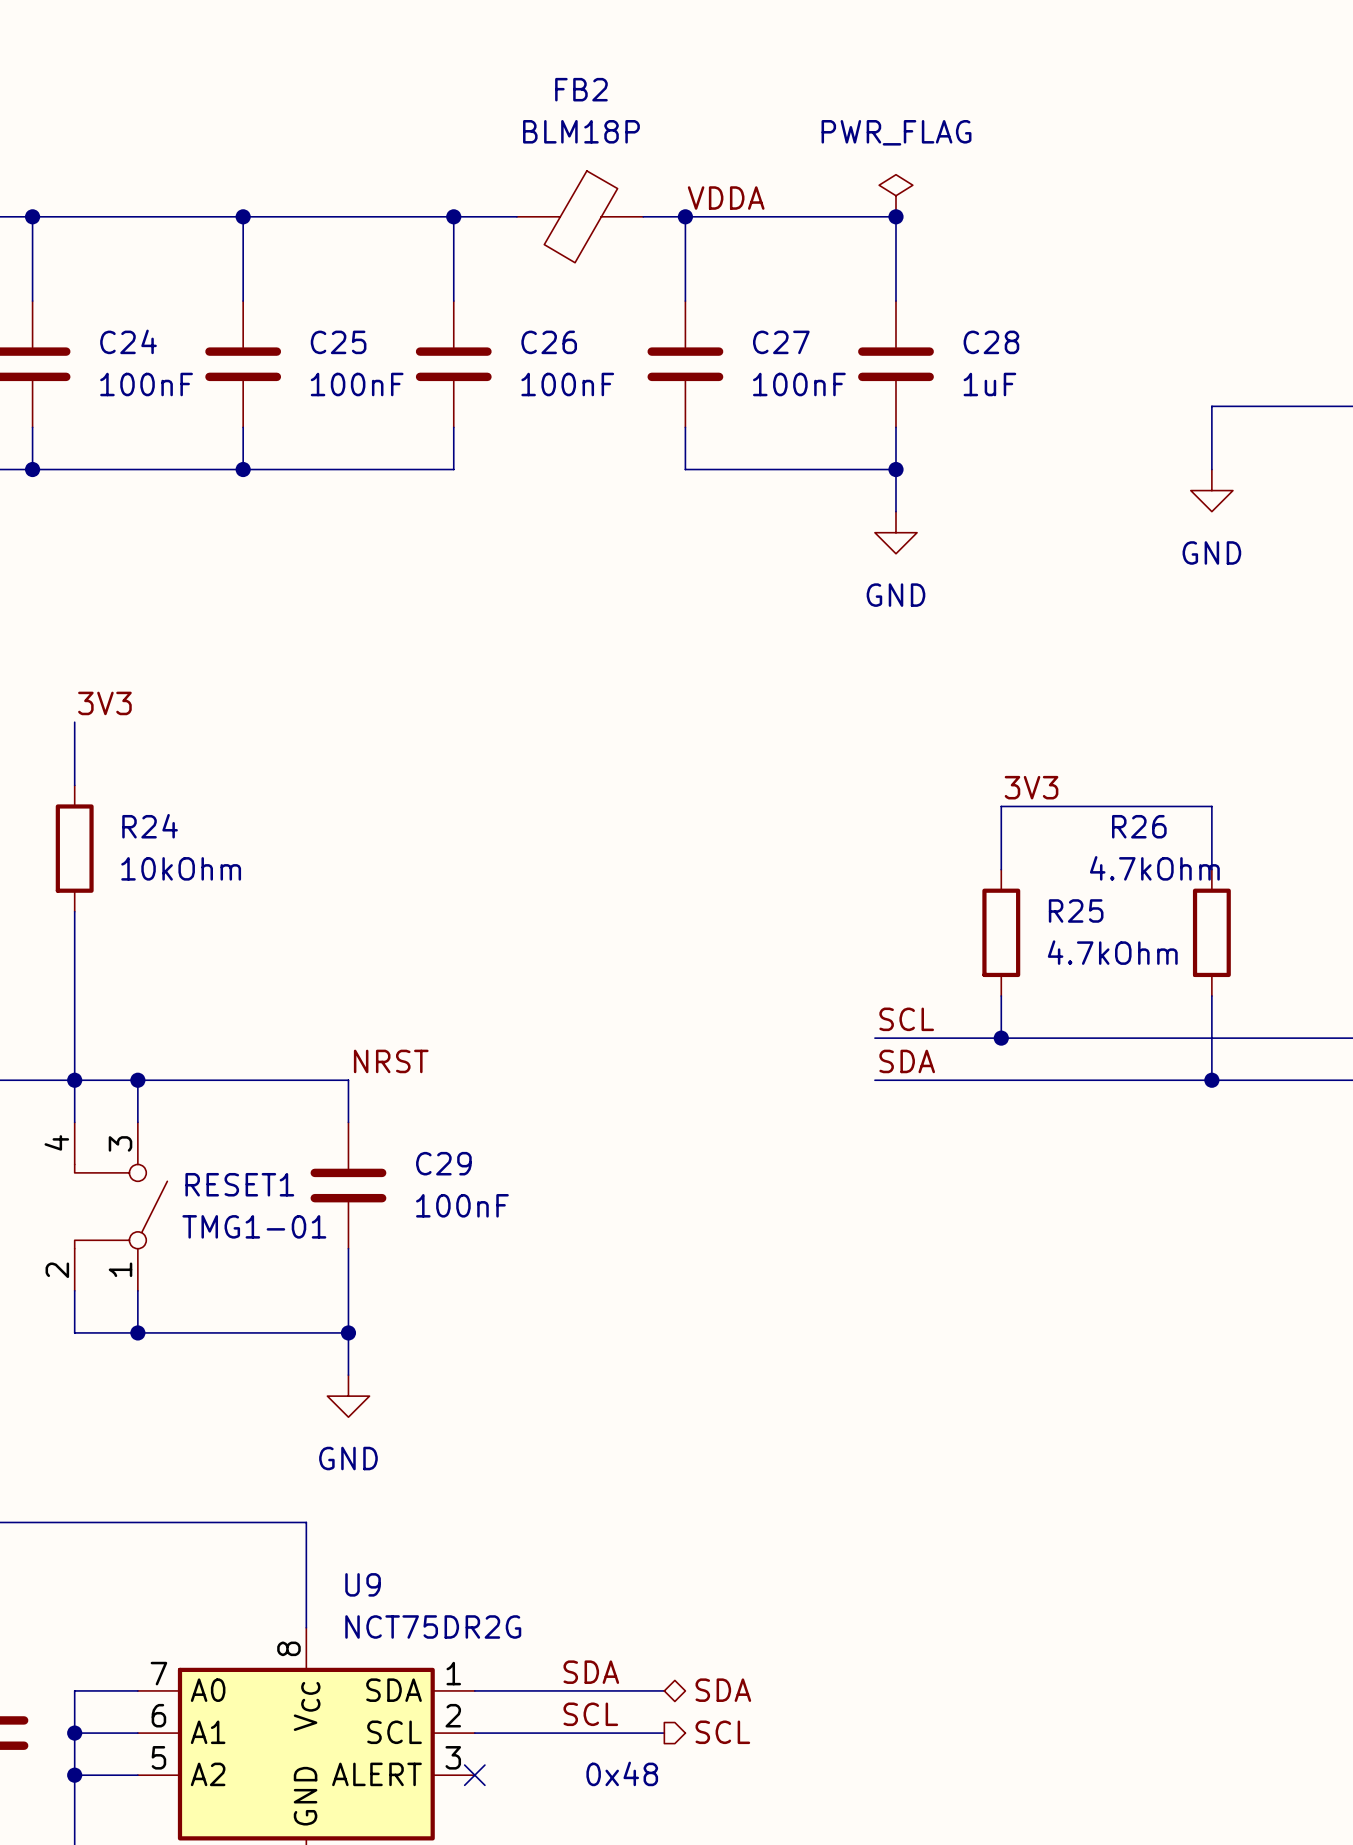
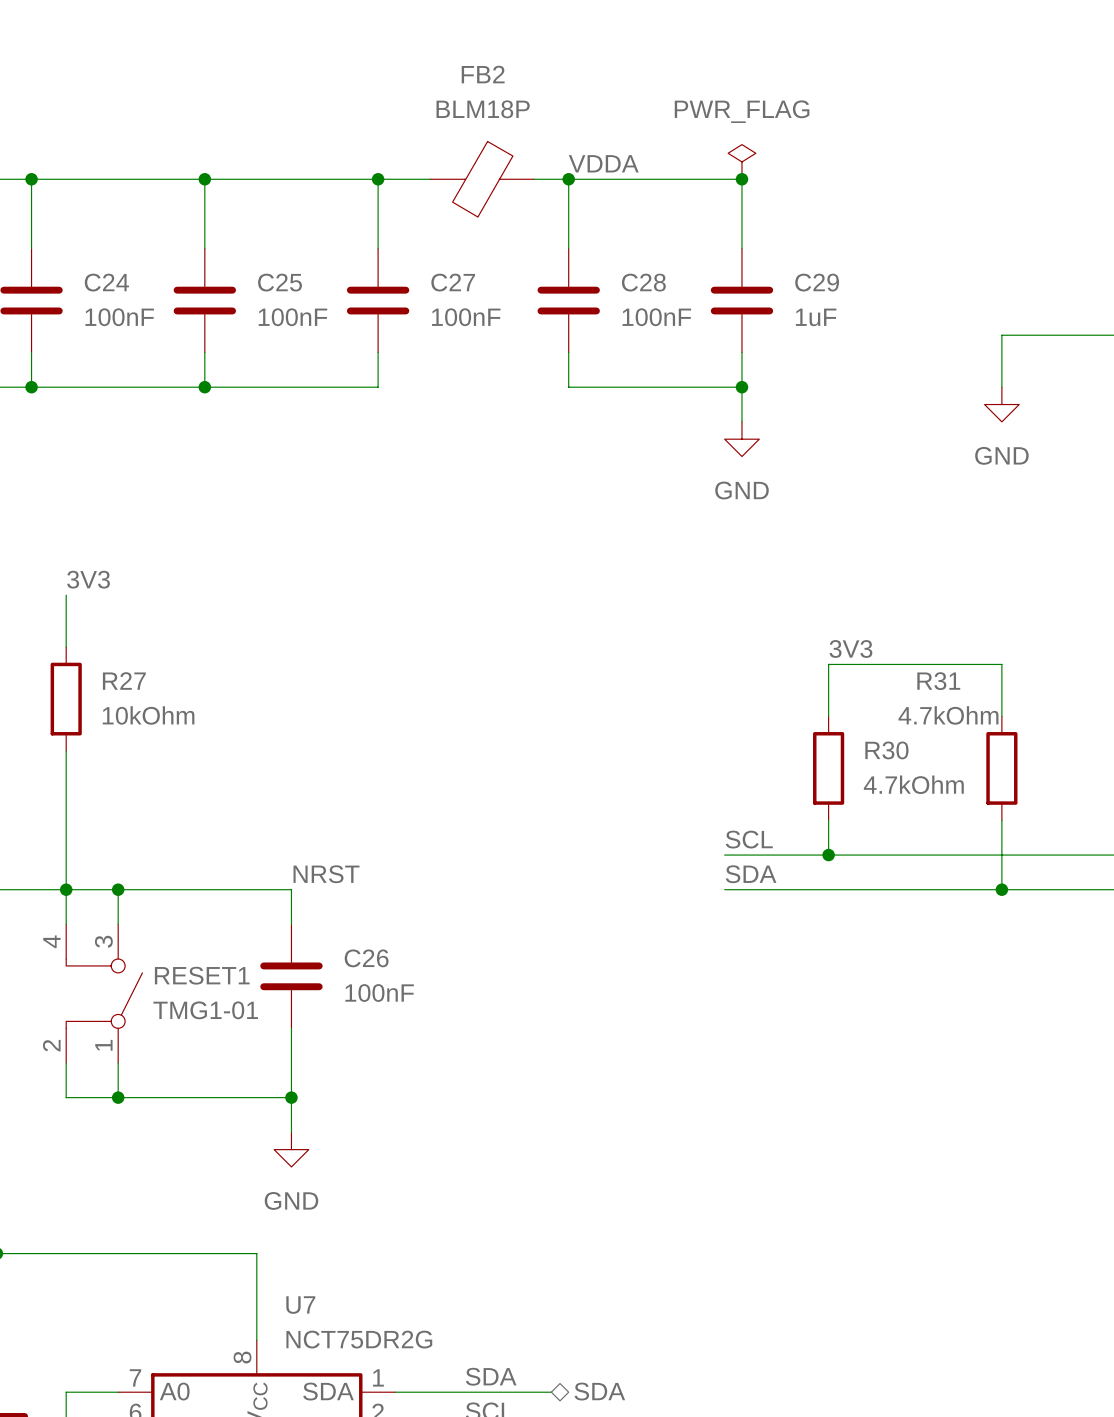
C26 name: C26 (549, 342) -> C27 (453, 282)
C27 name: C27 (781, 342) -> C28 (643, 282)
C28 name: C28 (991, 342) -> C29 (817, 282)
R24 name: R24 (150, 826) -> R27 (124, 680)
R26 name: R26 (1139, 826) -> R31 (938, 681)
R25 name: R25 (1076, 910) -> R30 (886, 750)
C29 name: C29 (443, 1163) -> C26 (366, 958)
U9 name: U9 (363, 1584) -> U7 (300, 1305)

